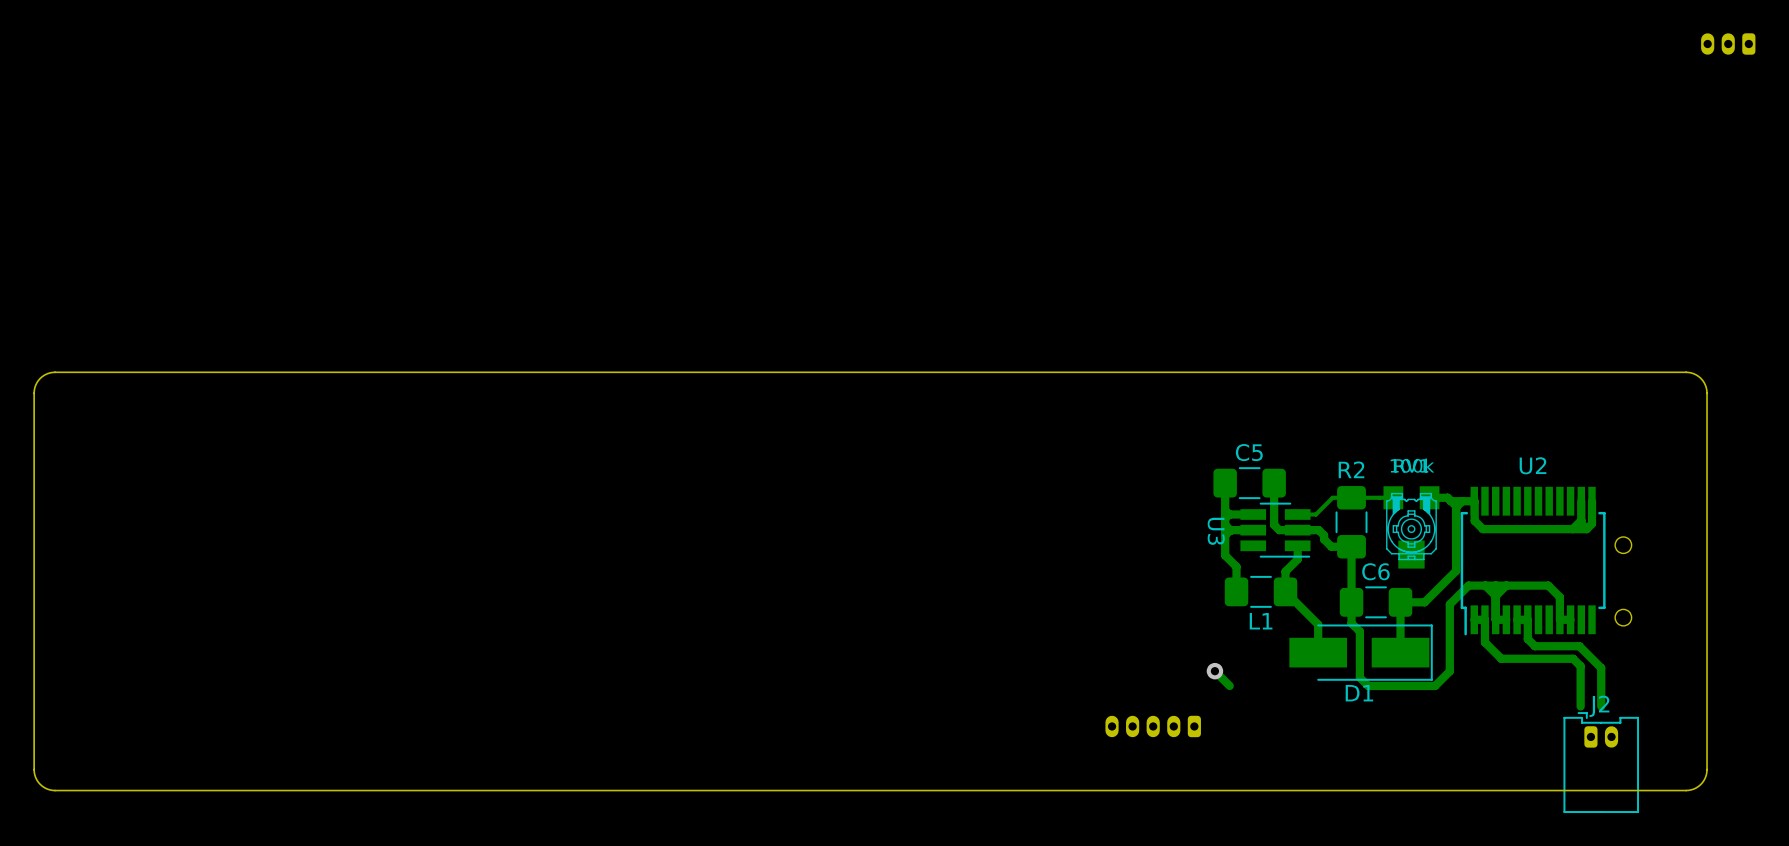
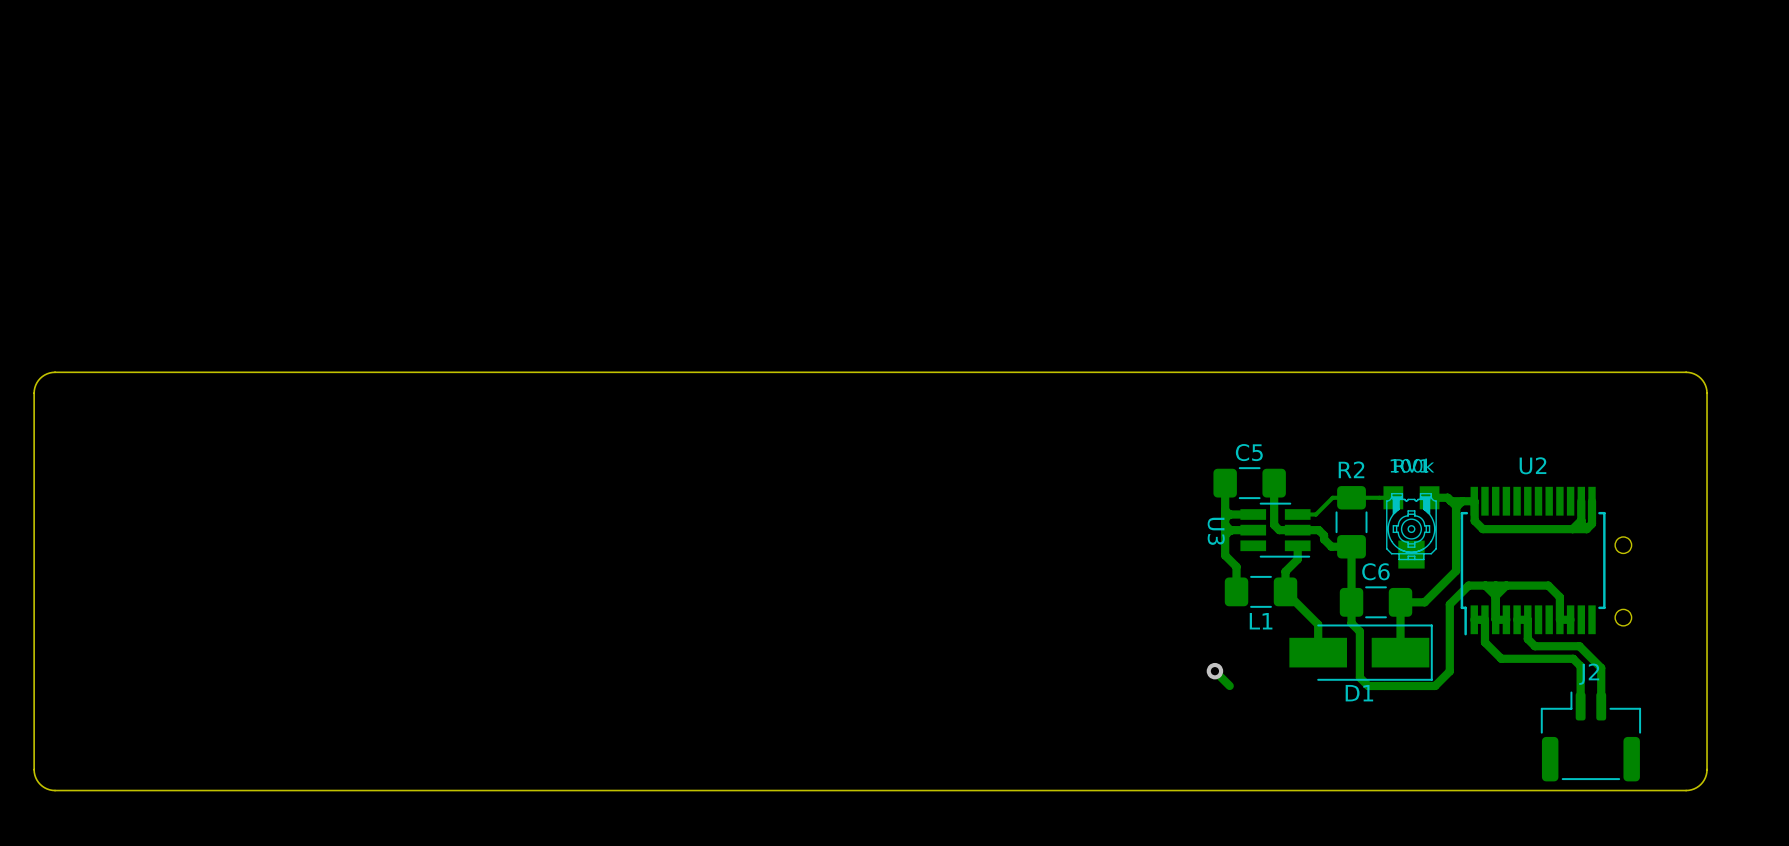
part: (1728, 44) -> none
J2 footprint: [1563, 712, 1640, 814] -> [1540, 691, 1642, 782]
part: (1153, 726) -> none

